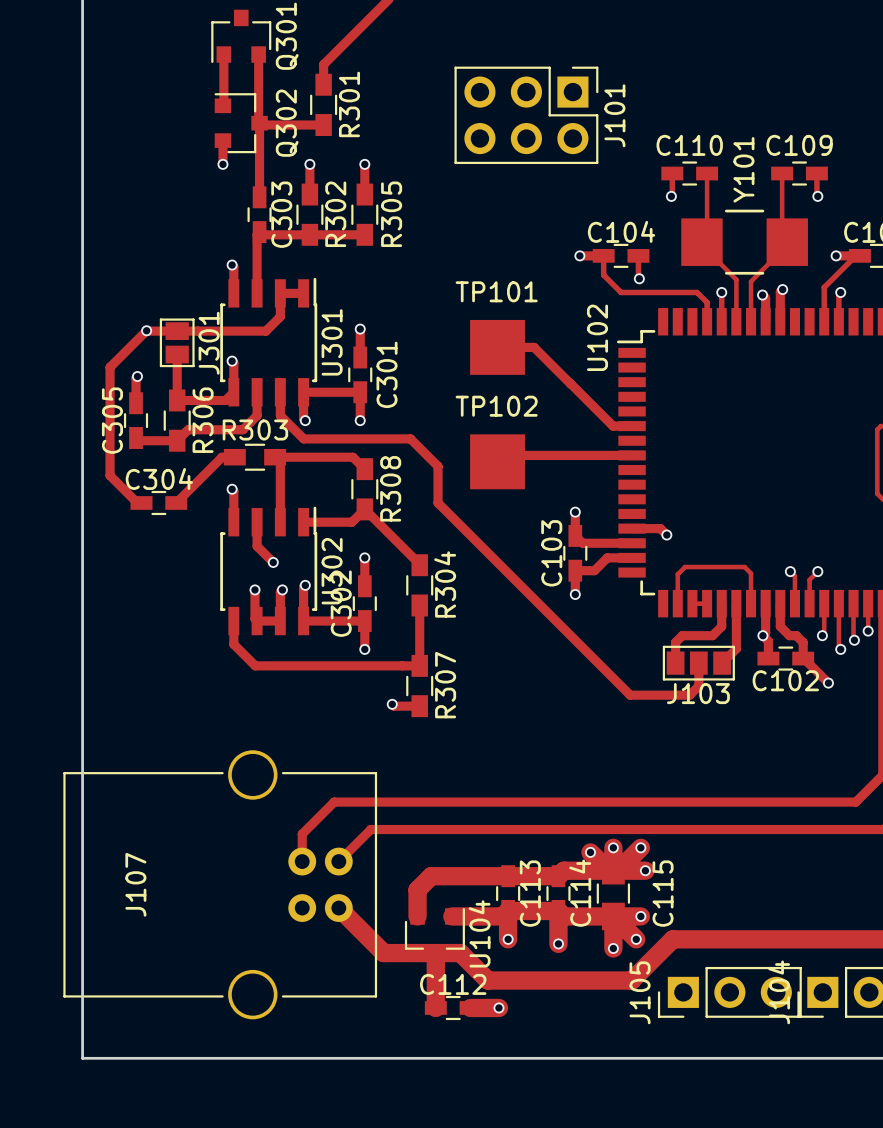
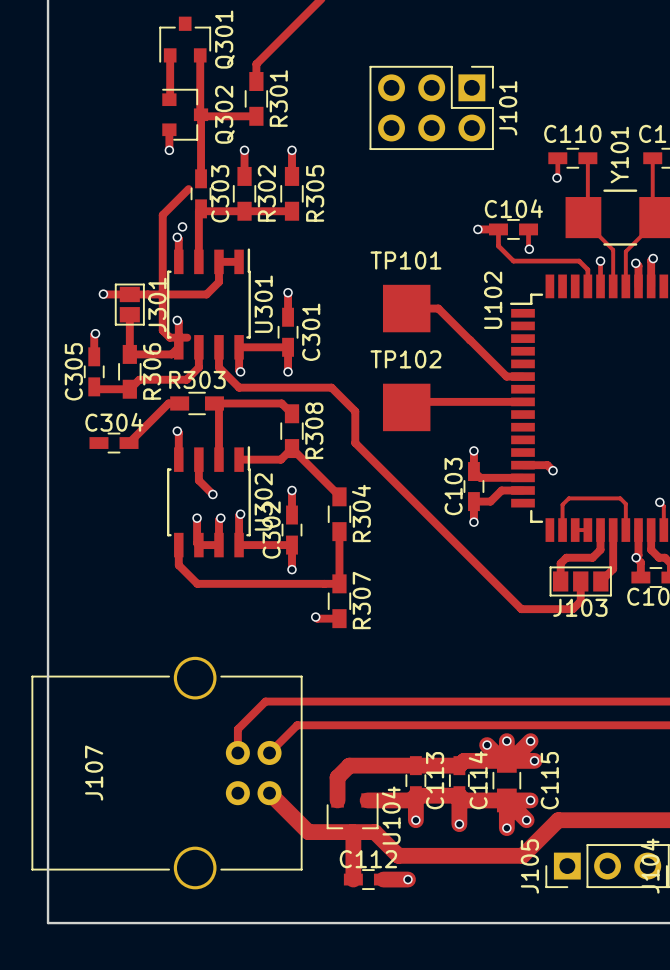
track: none -> (188, 189) (162, 215) (162, 330) (169, 337) (187, 337)
via: none -> (182, 226)
track: (146, 330) (110, 367) (110, 475) (137, 502) (141, 502) -> none

